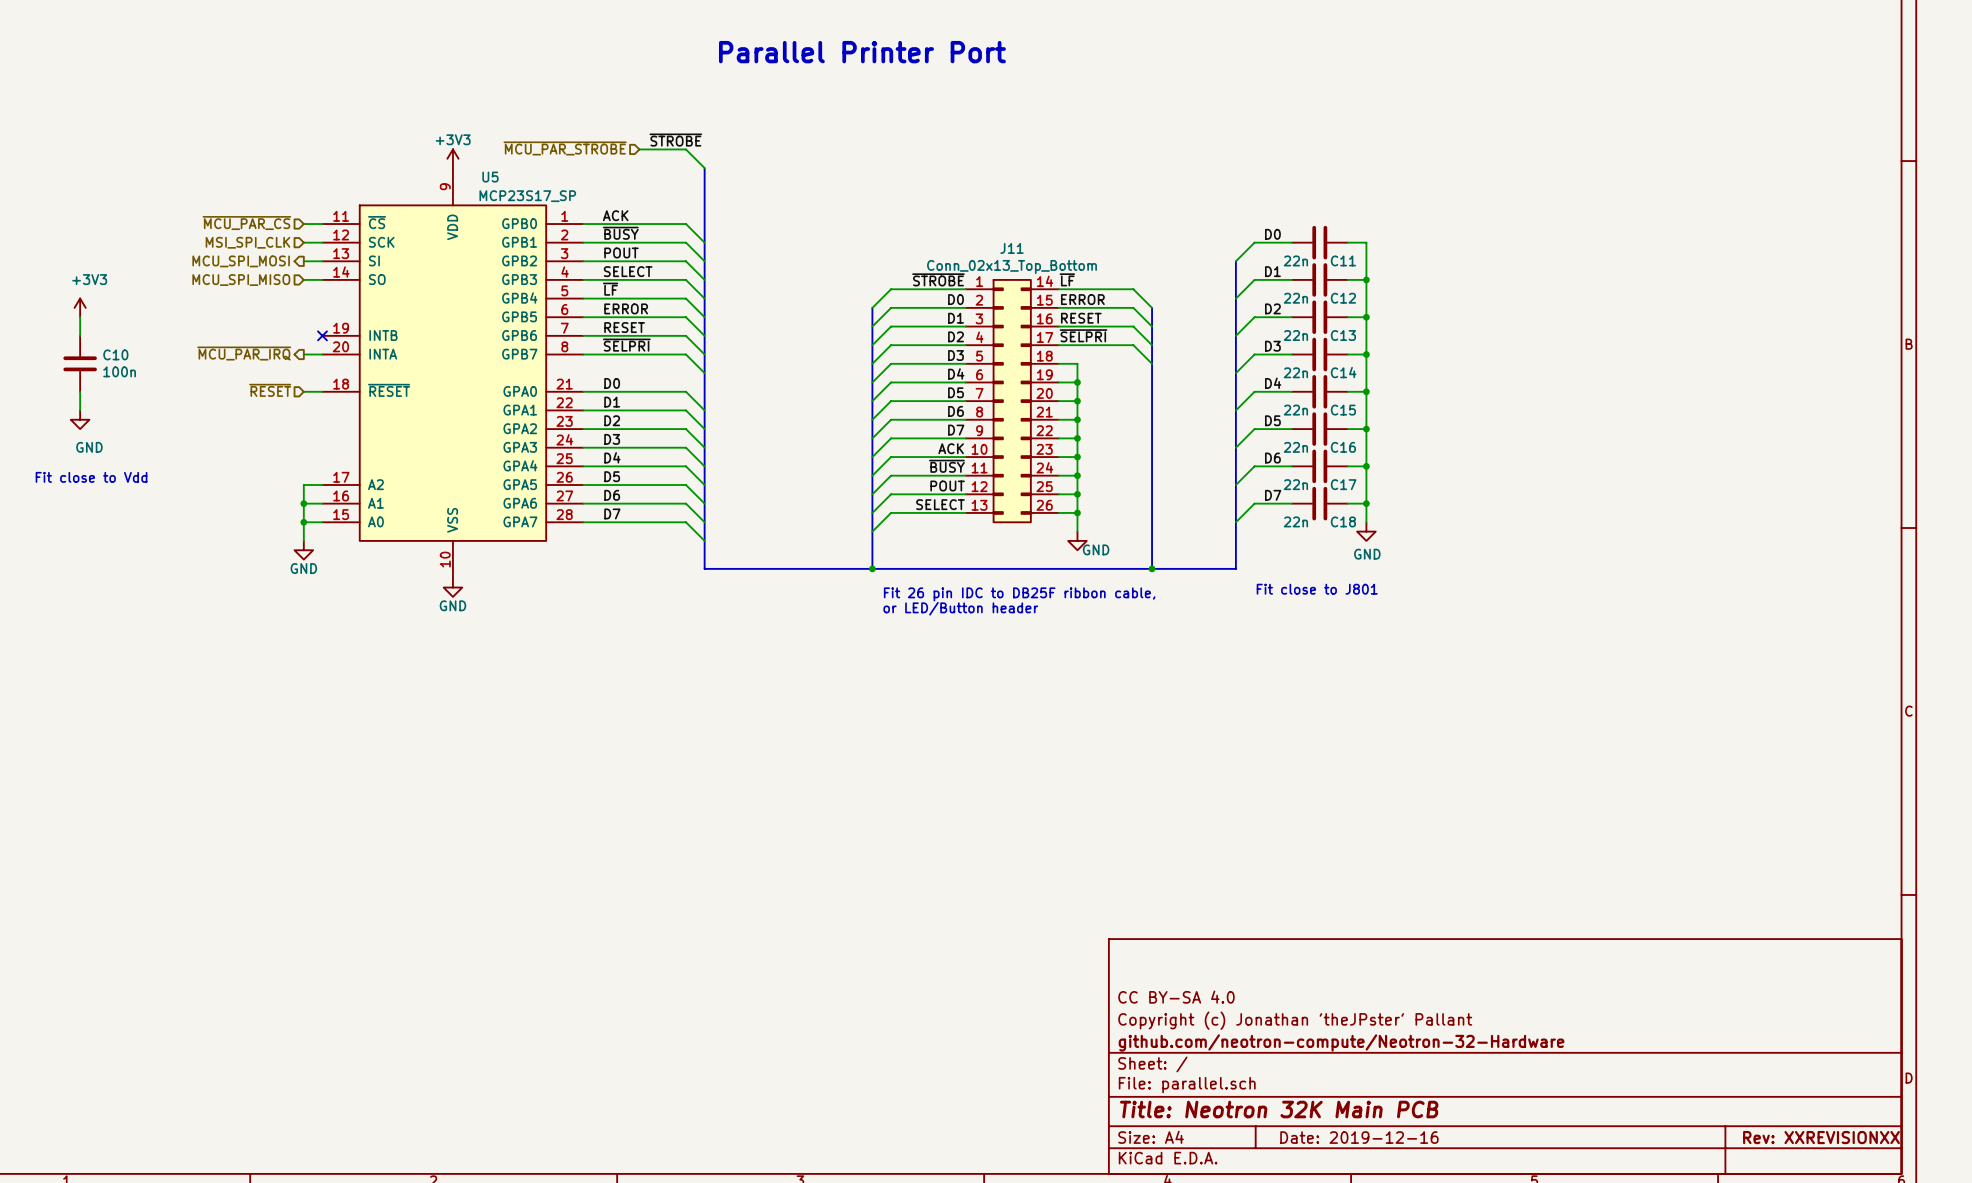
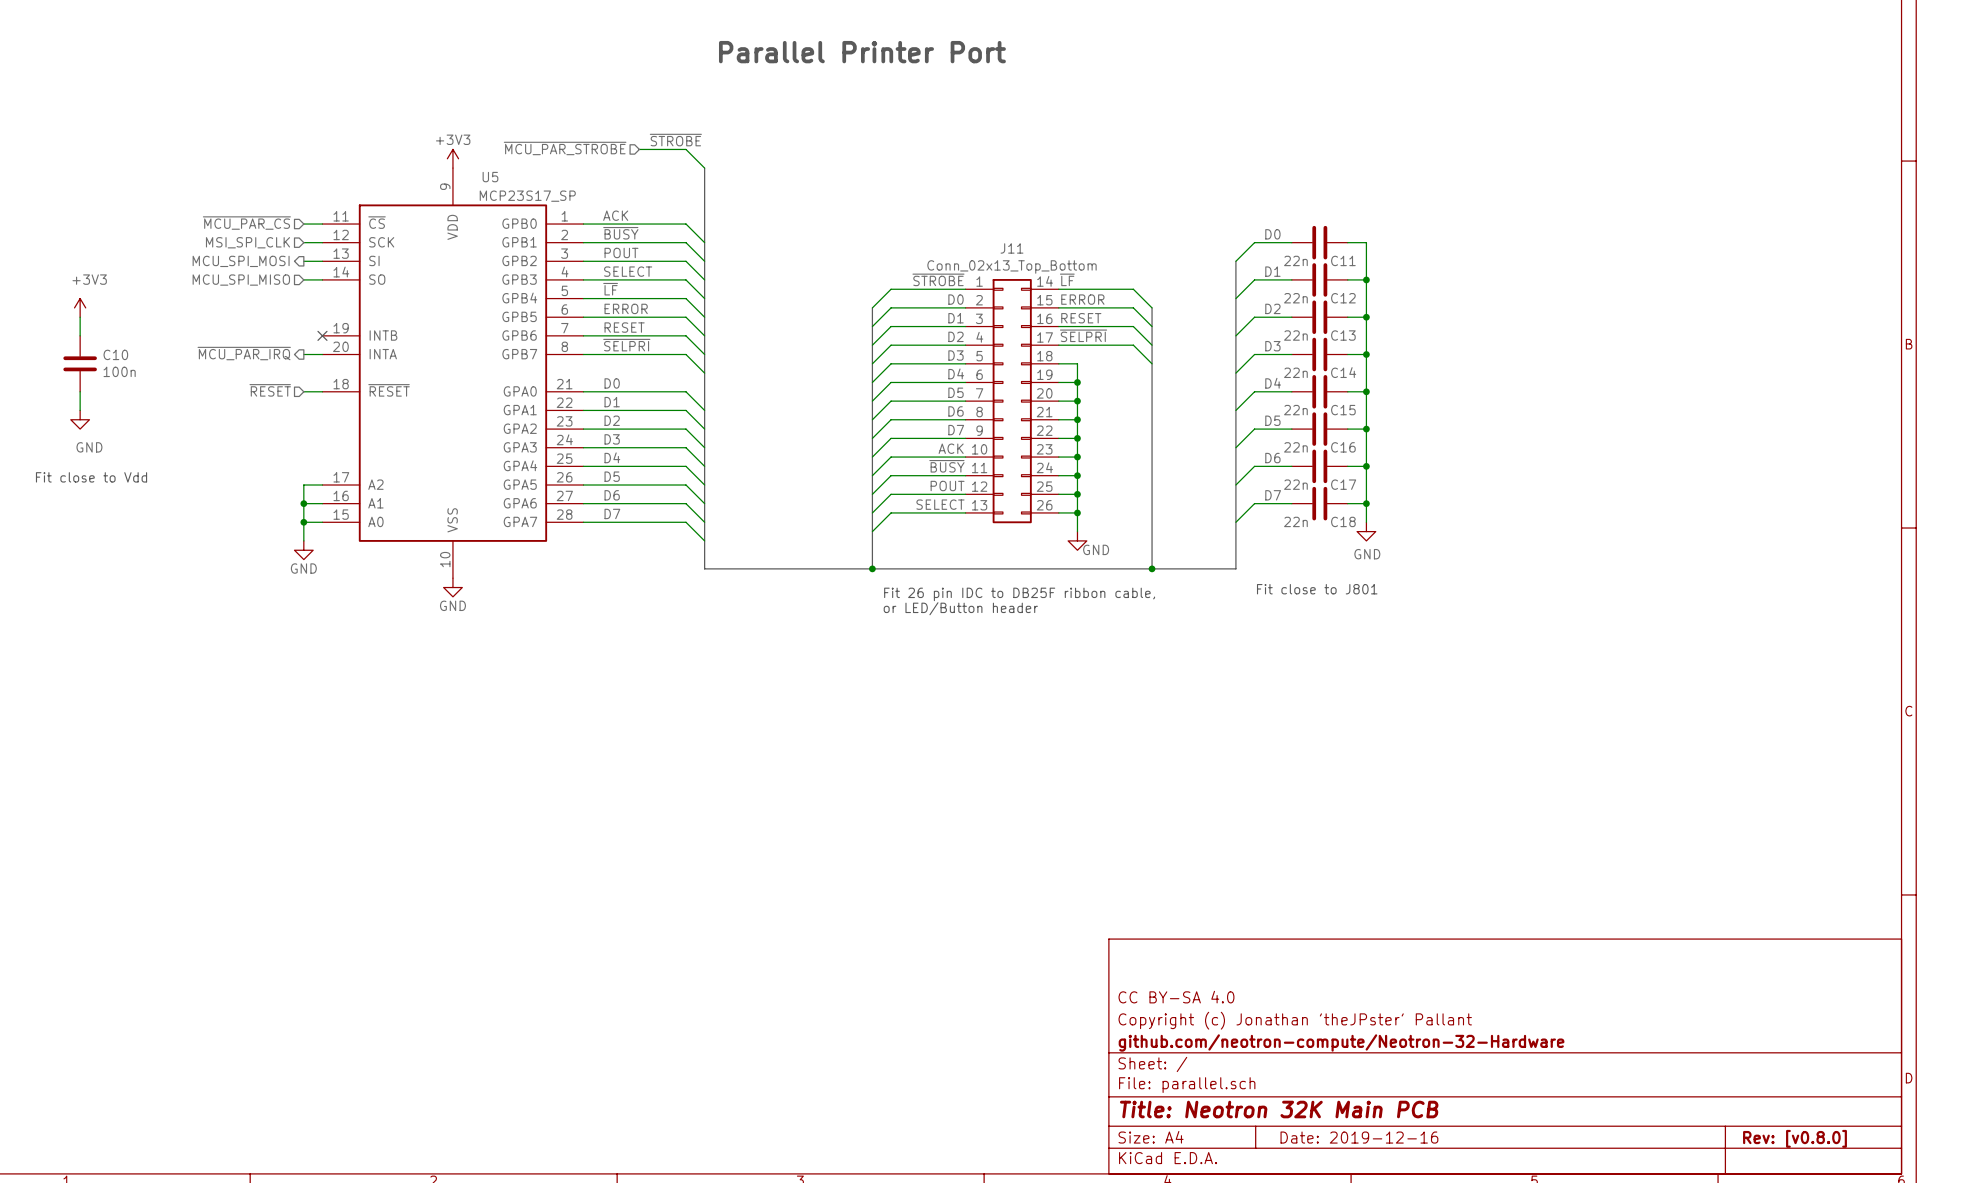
title block: Rev: XXREVISIONXX (1821, 1137) -> Rev: [v0.8.0] (1794, 1138)

